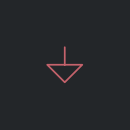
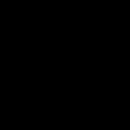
power symbol: (64, 64) -> none

